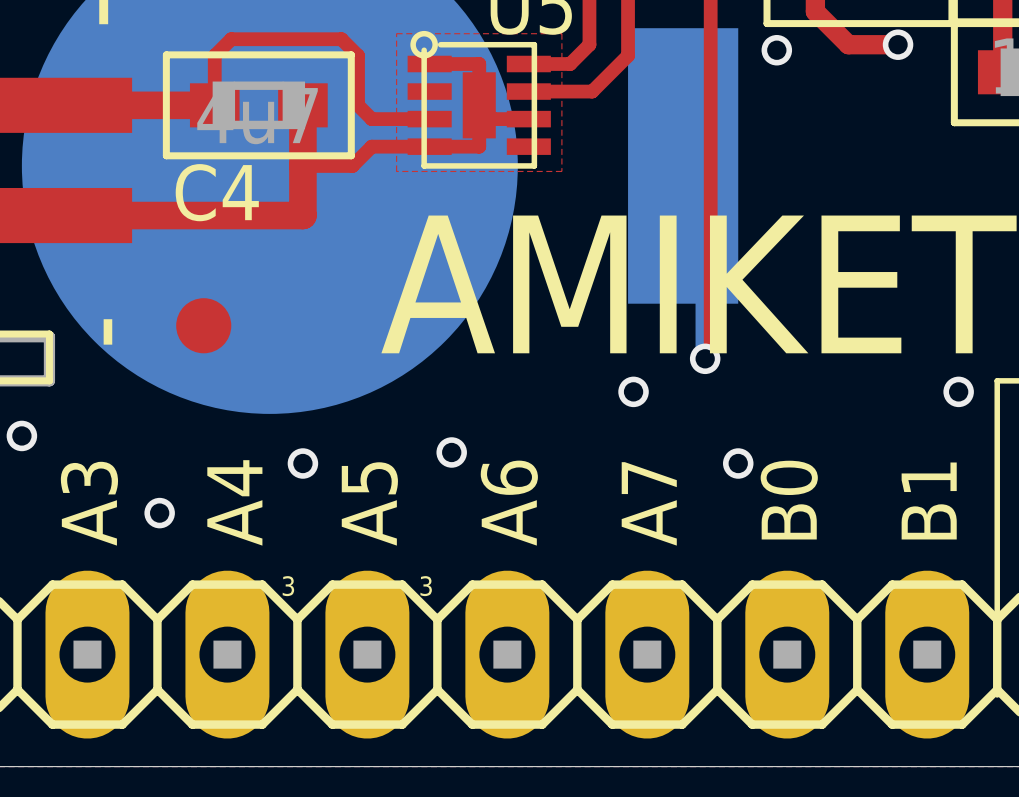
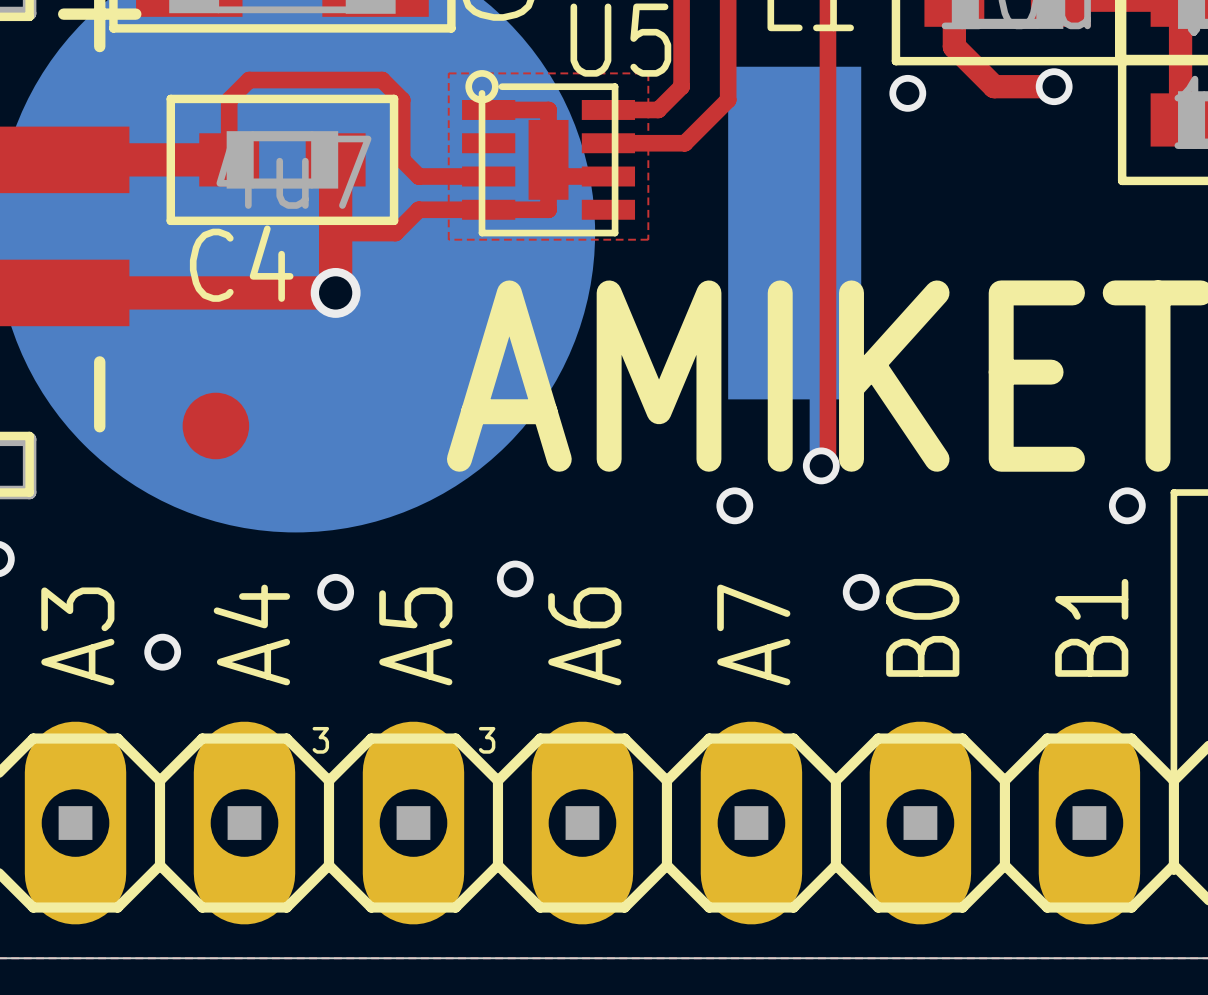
via: none -> (335, 292)

